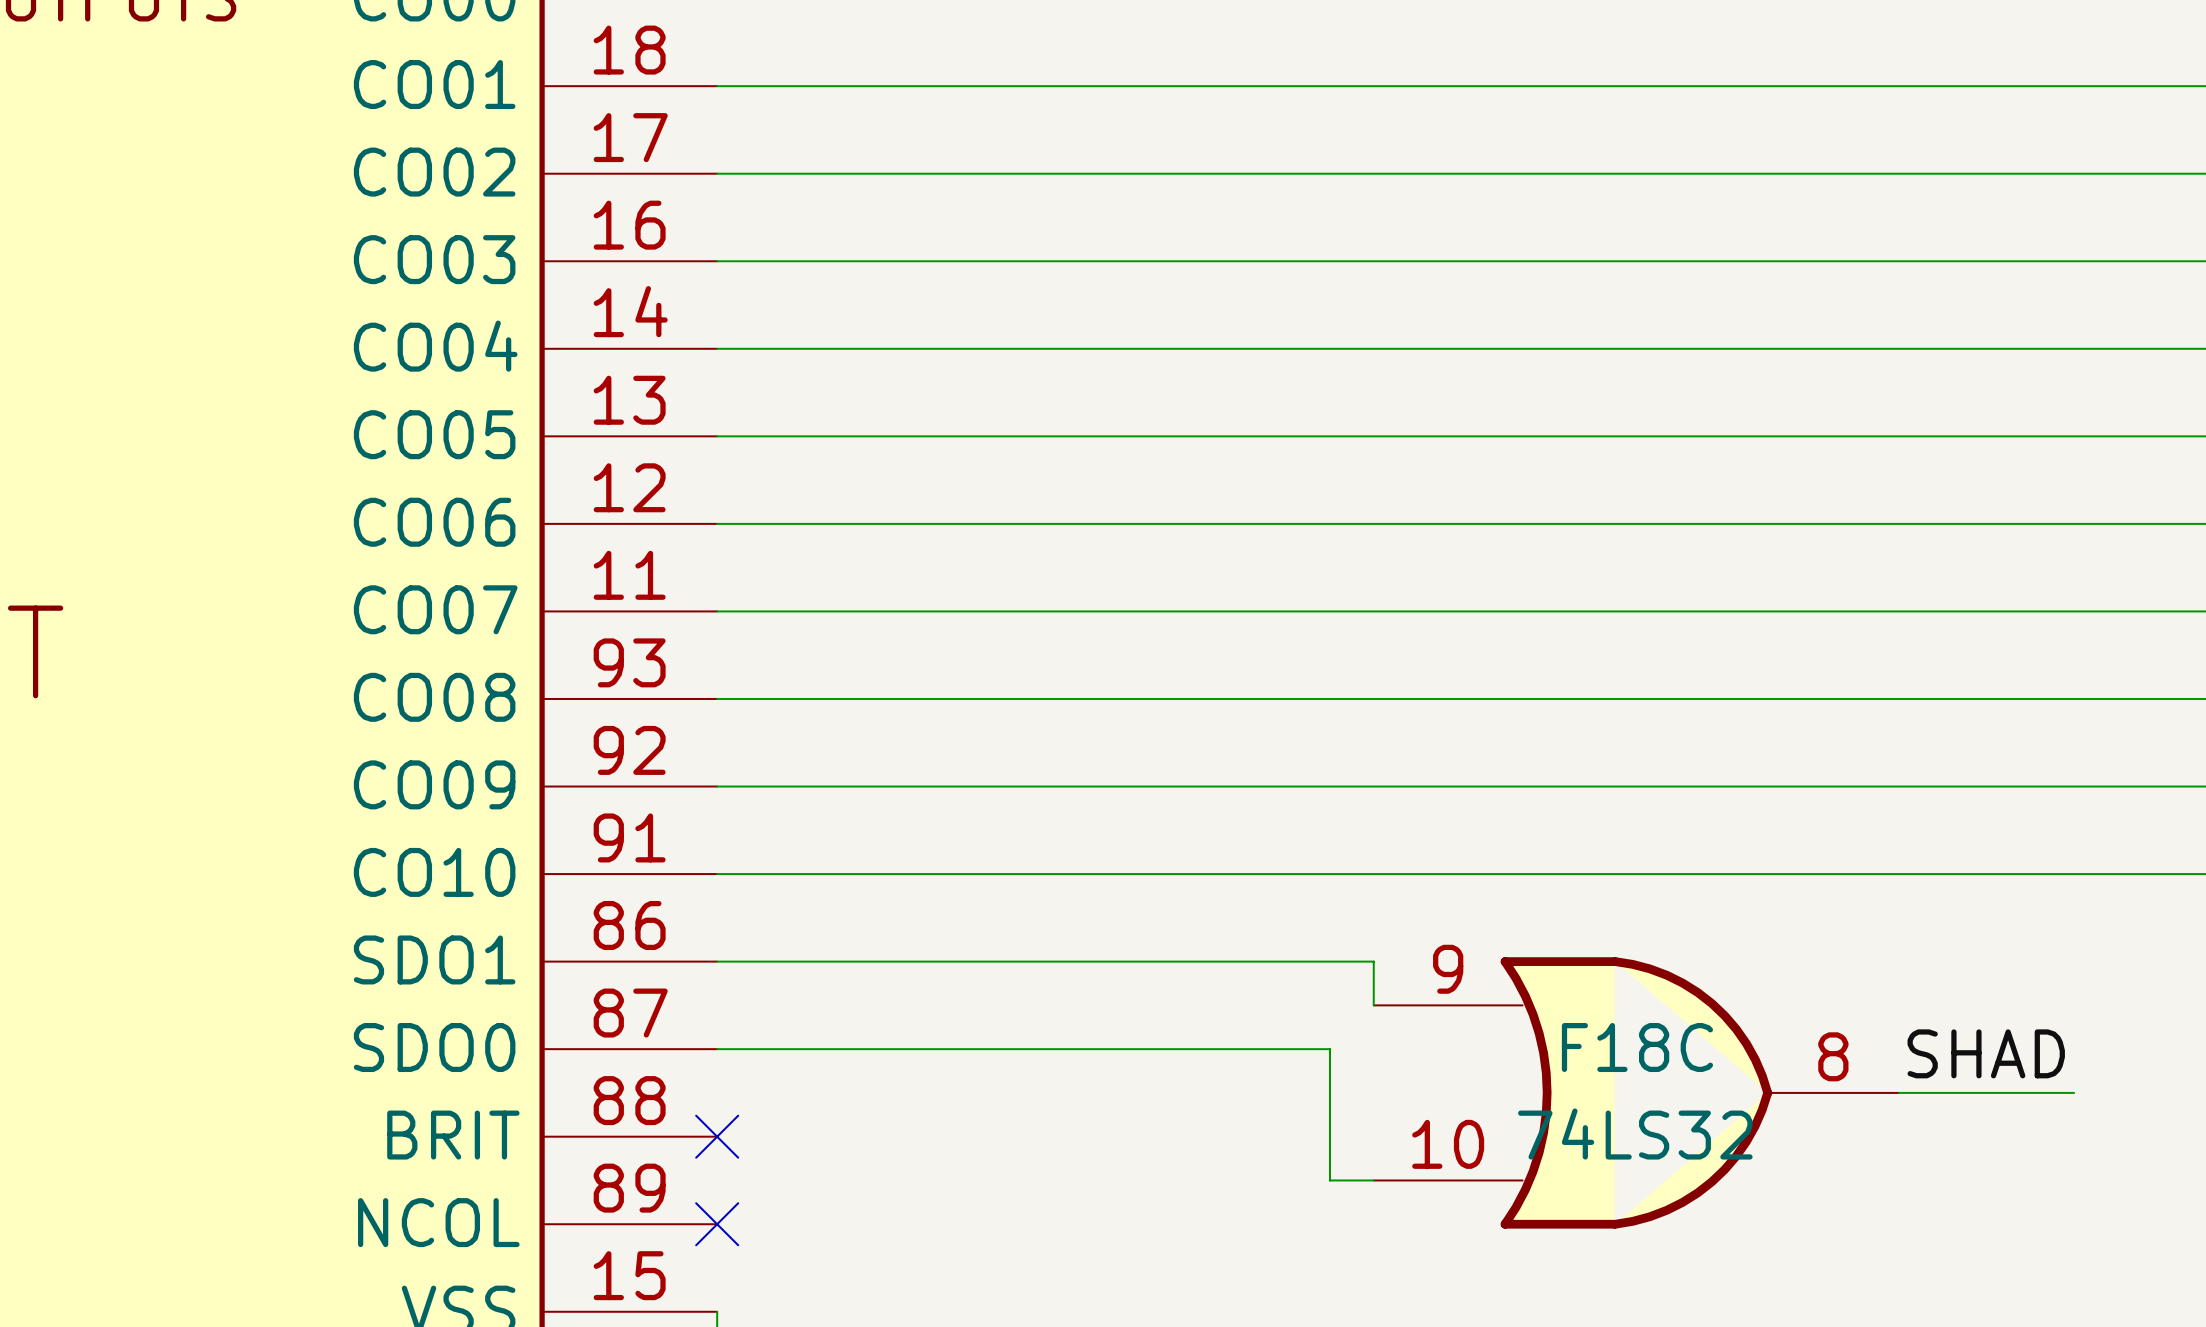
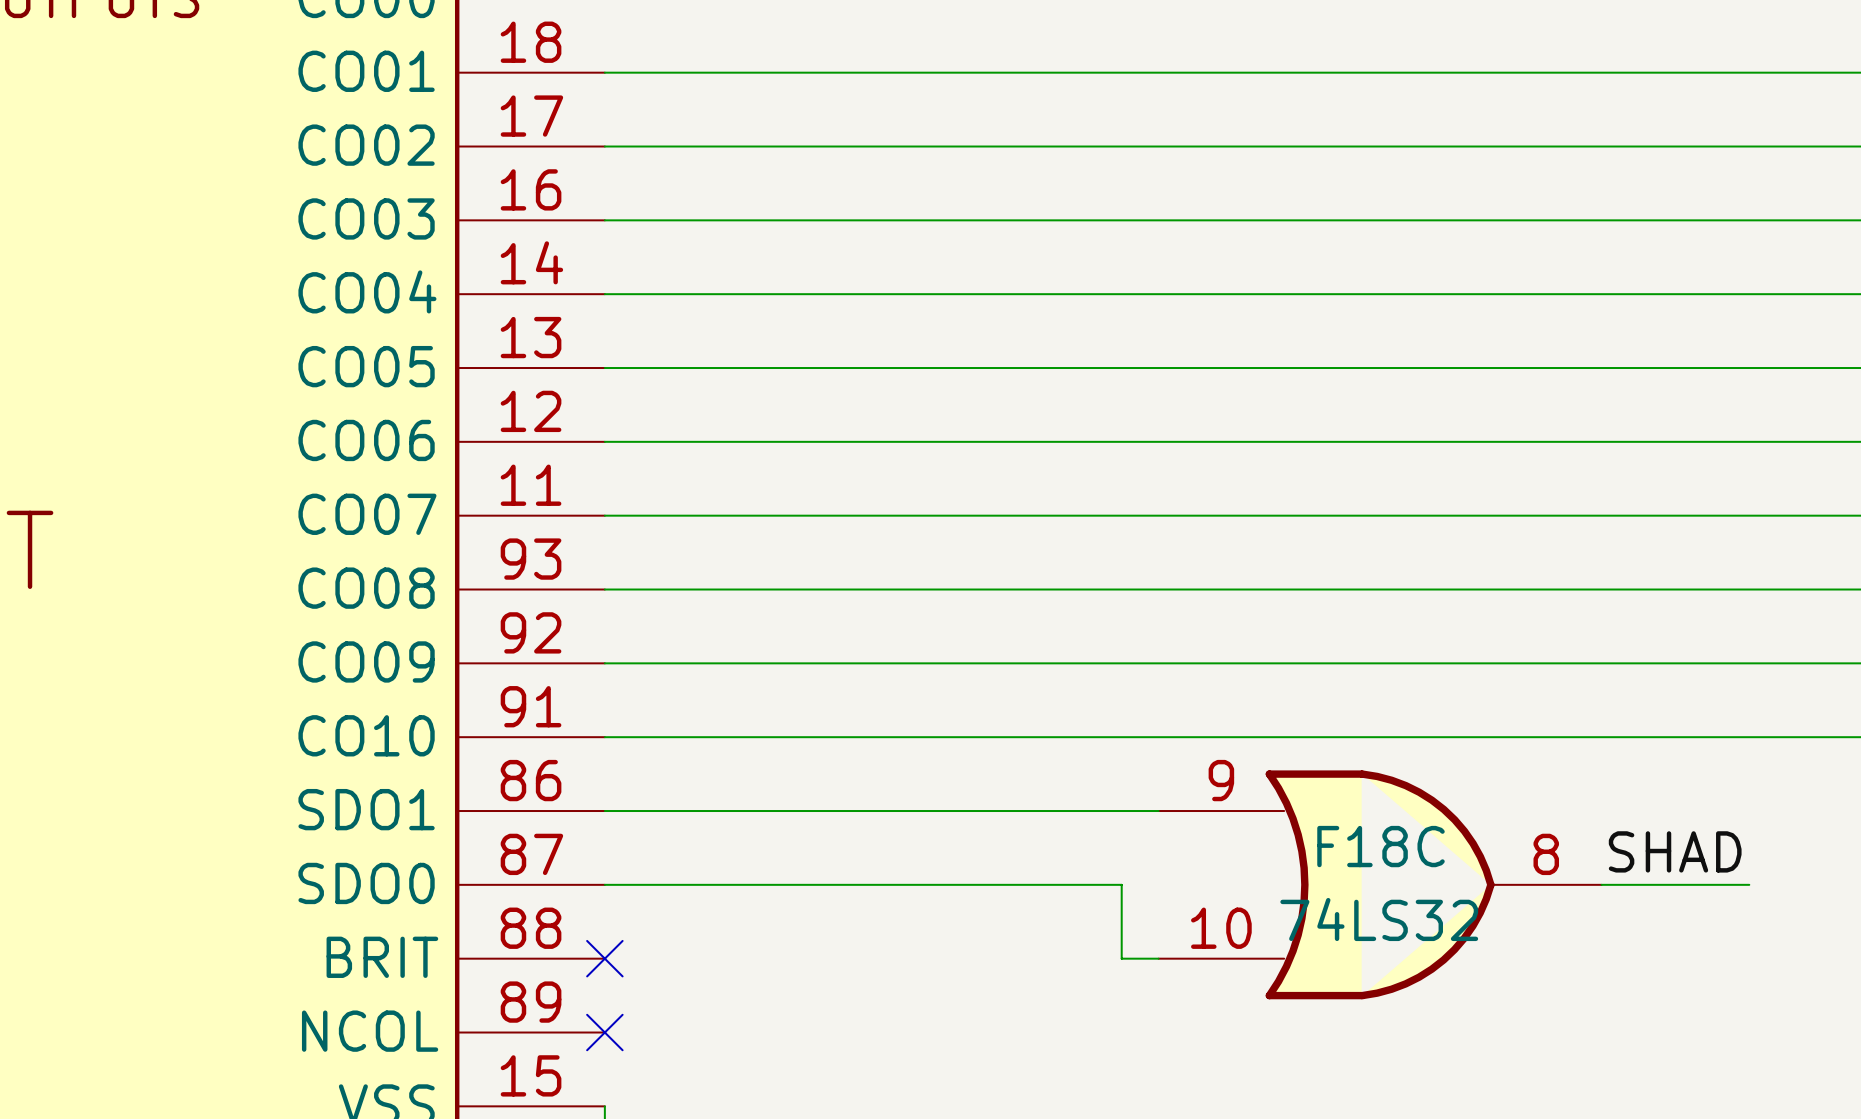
wire: (1373, 961) (1373, 1005) -> none
label position: SHAD (1986, 1053) -> SHAD (1675, 851)
F18C position: (1636, 1092) -> (1380, 884)
wire: (1899, 1092) (2074, 1092) -> (1601, 884) (1749, 884)
wire: (1329, 1136) (1329, 1180) (1373, 1180) -> (1121, 958) (1158, 958)

